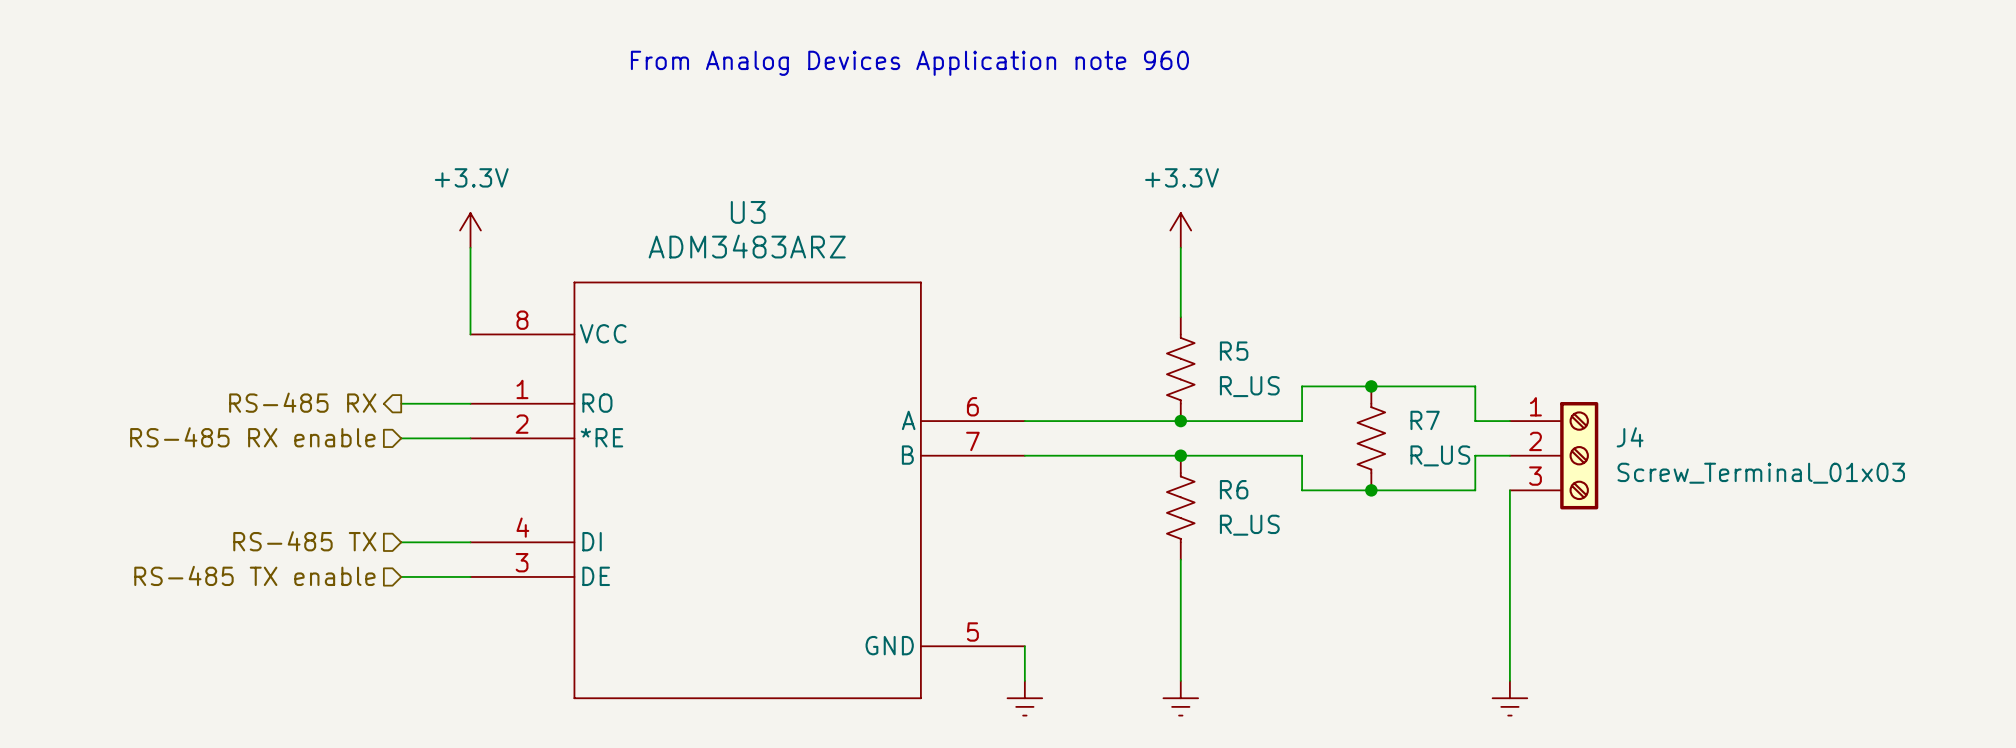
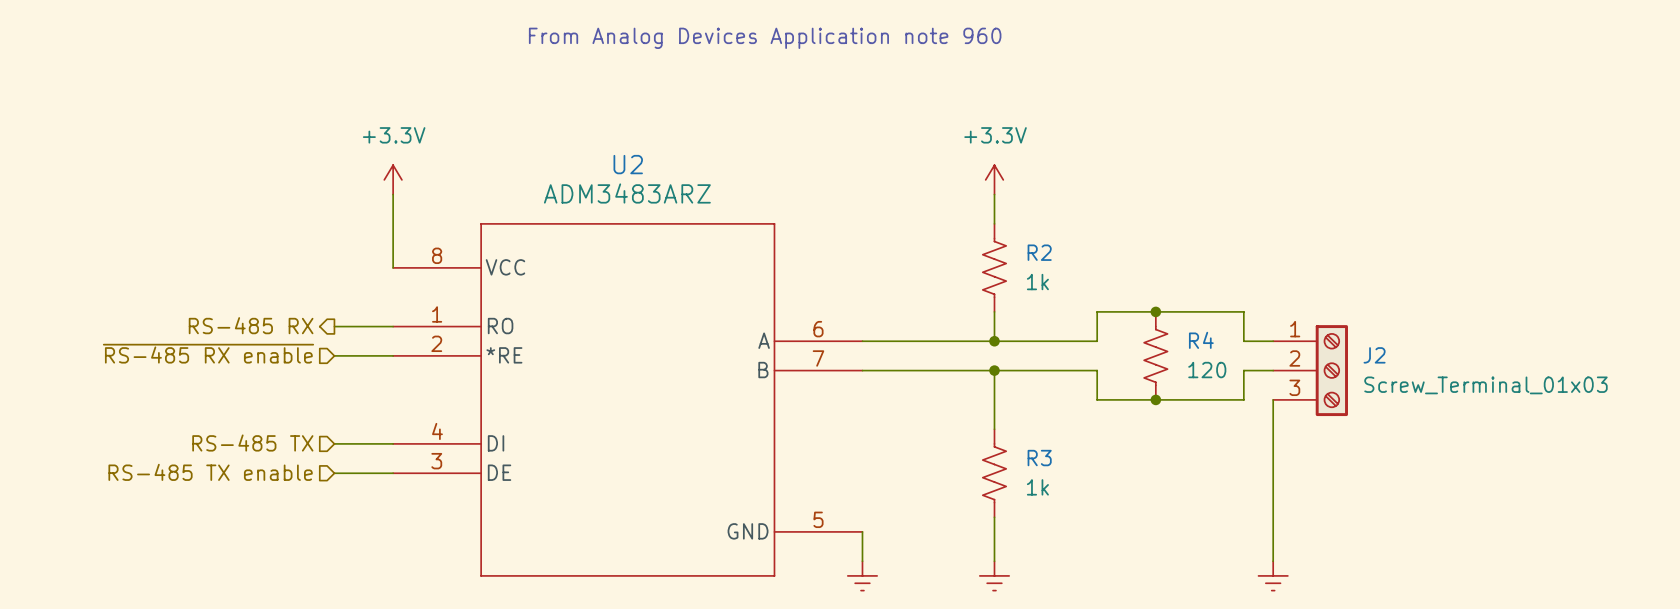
U3 name: U3 (748, 212) -> U2 (628, 164)
R2: none -> 1k (994, 267)
R5: R_US (1180, 369) -> none
R7 name: R7 (1425, 420) -> R4 (1201, 340)
hierarchical label: RS-485 RX enable (252, 437) -> ~{RS-485 RX enable} (208, 353)
J4 name: J4 (1630, 437) -> J2 (1374, 355)
R7 value: R_US (1440, 455) -> 120 (1207, 370)
R6: R_US (1180, 507) -> none
wire: (1180, 559) (1180, 628) -> (994, 370) (994, 429)
R3: none -> 1k (994, 473)

